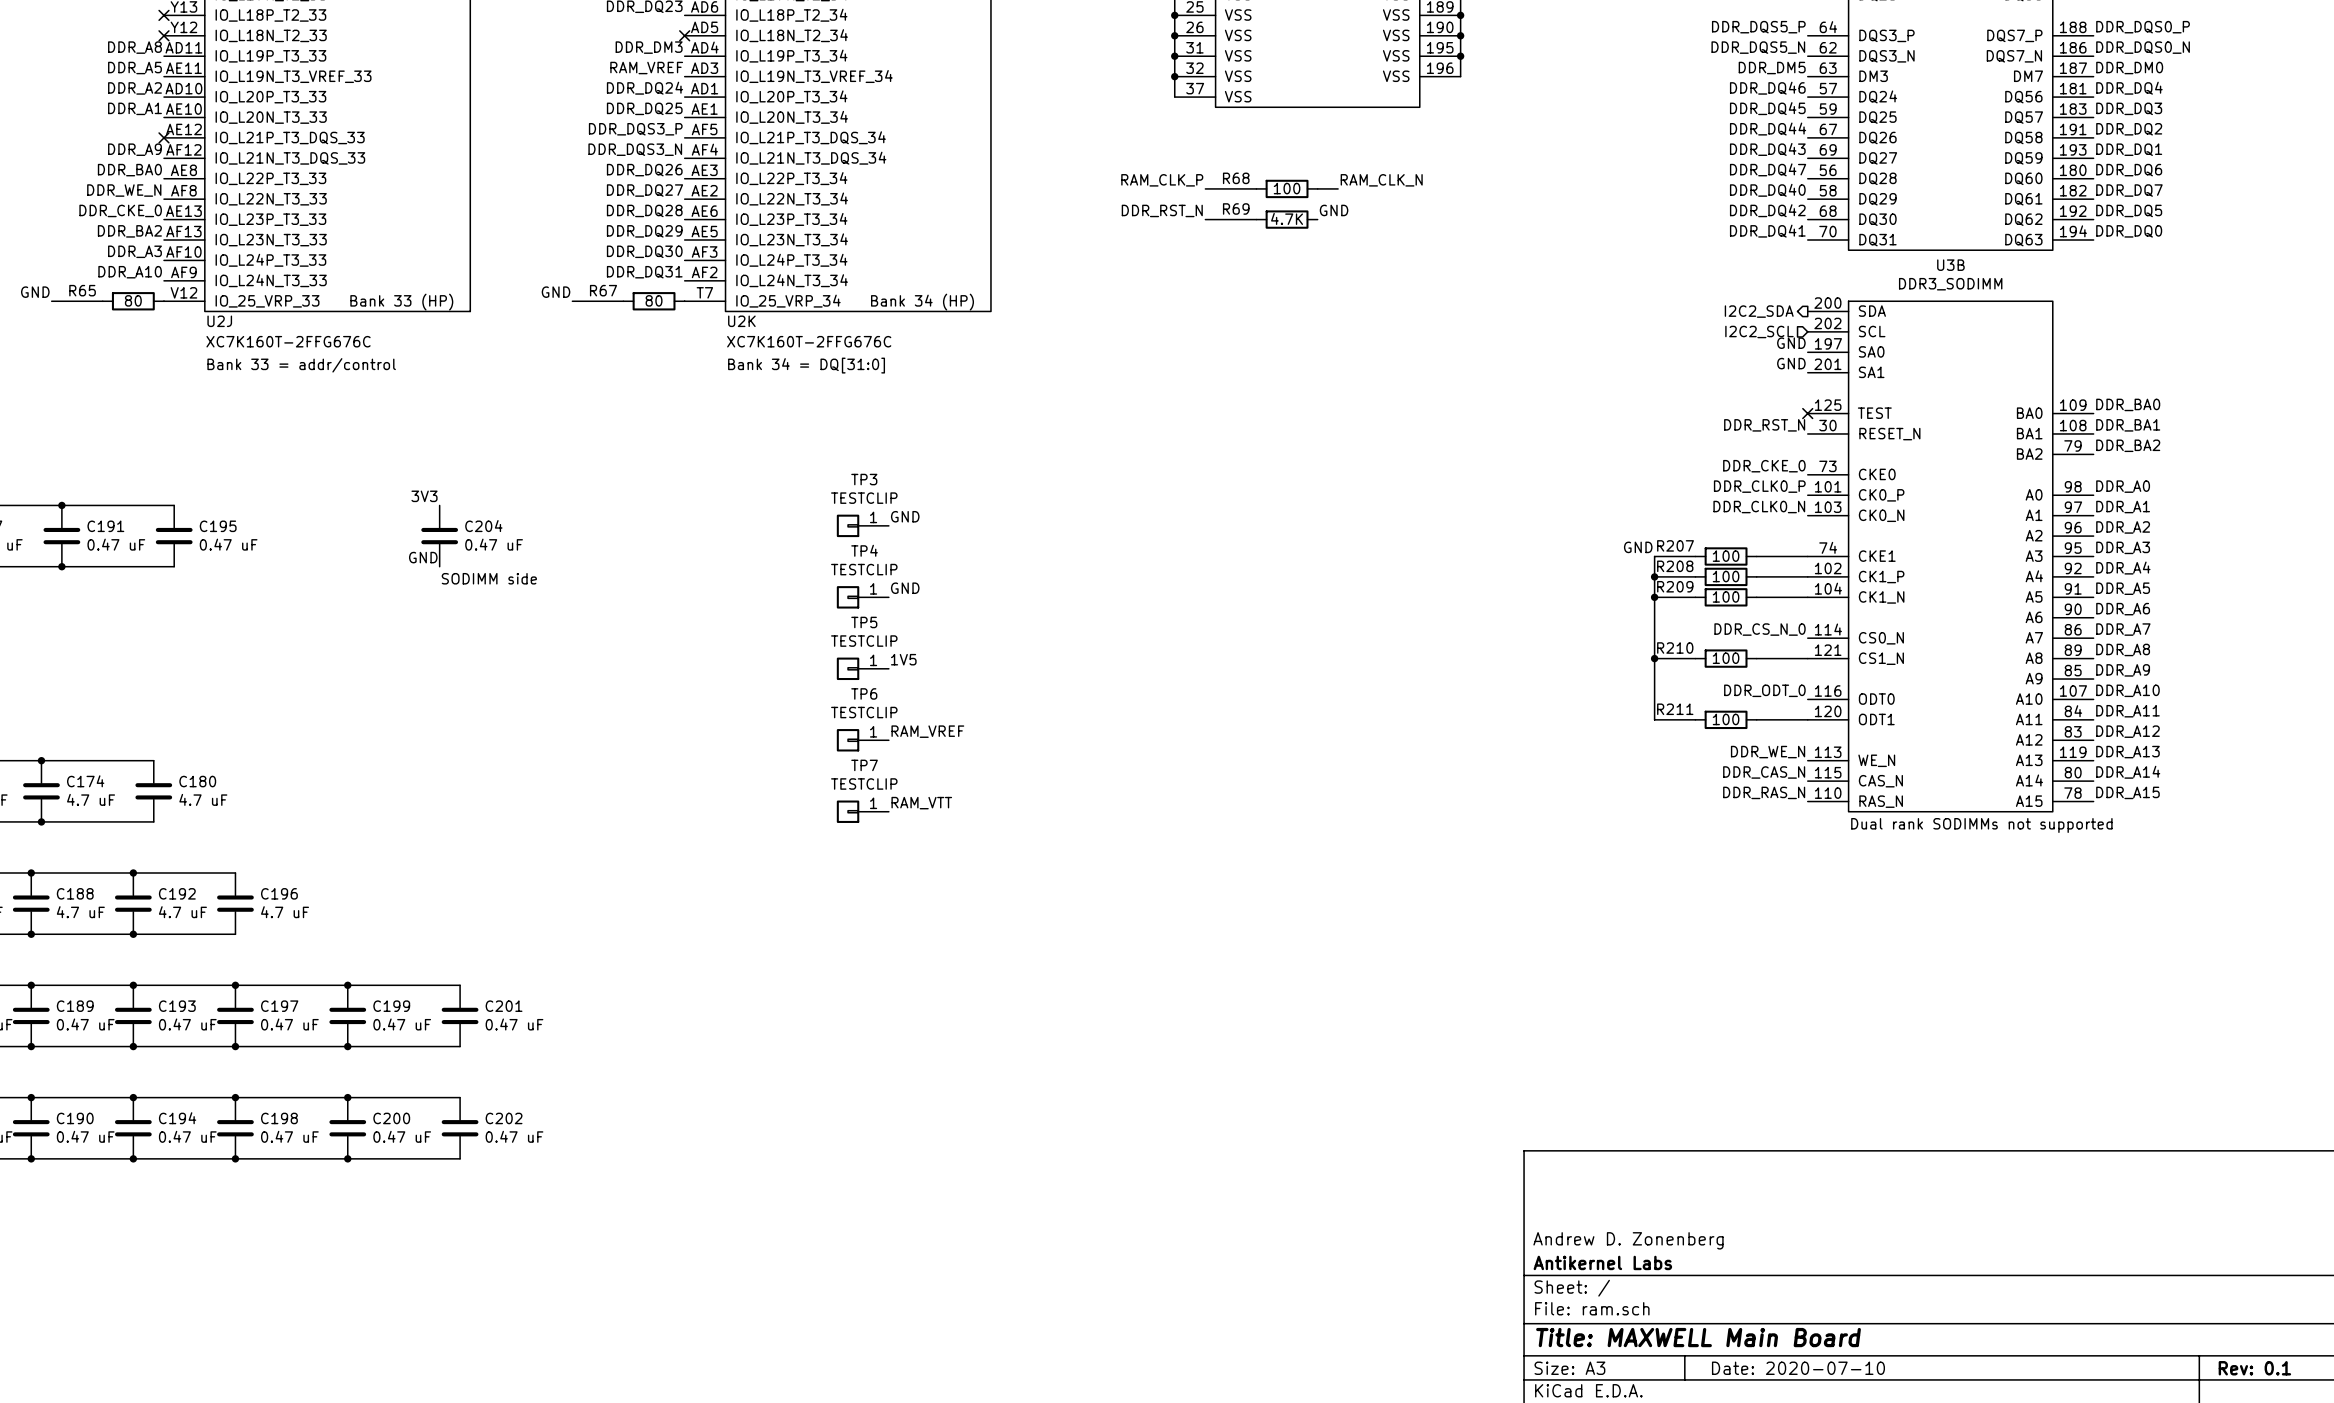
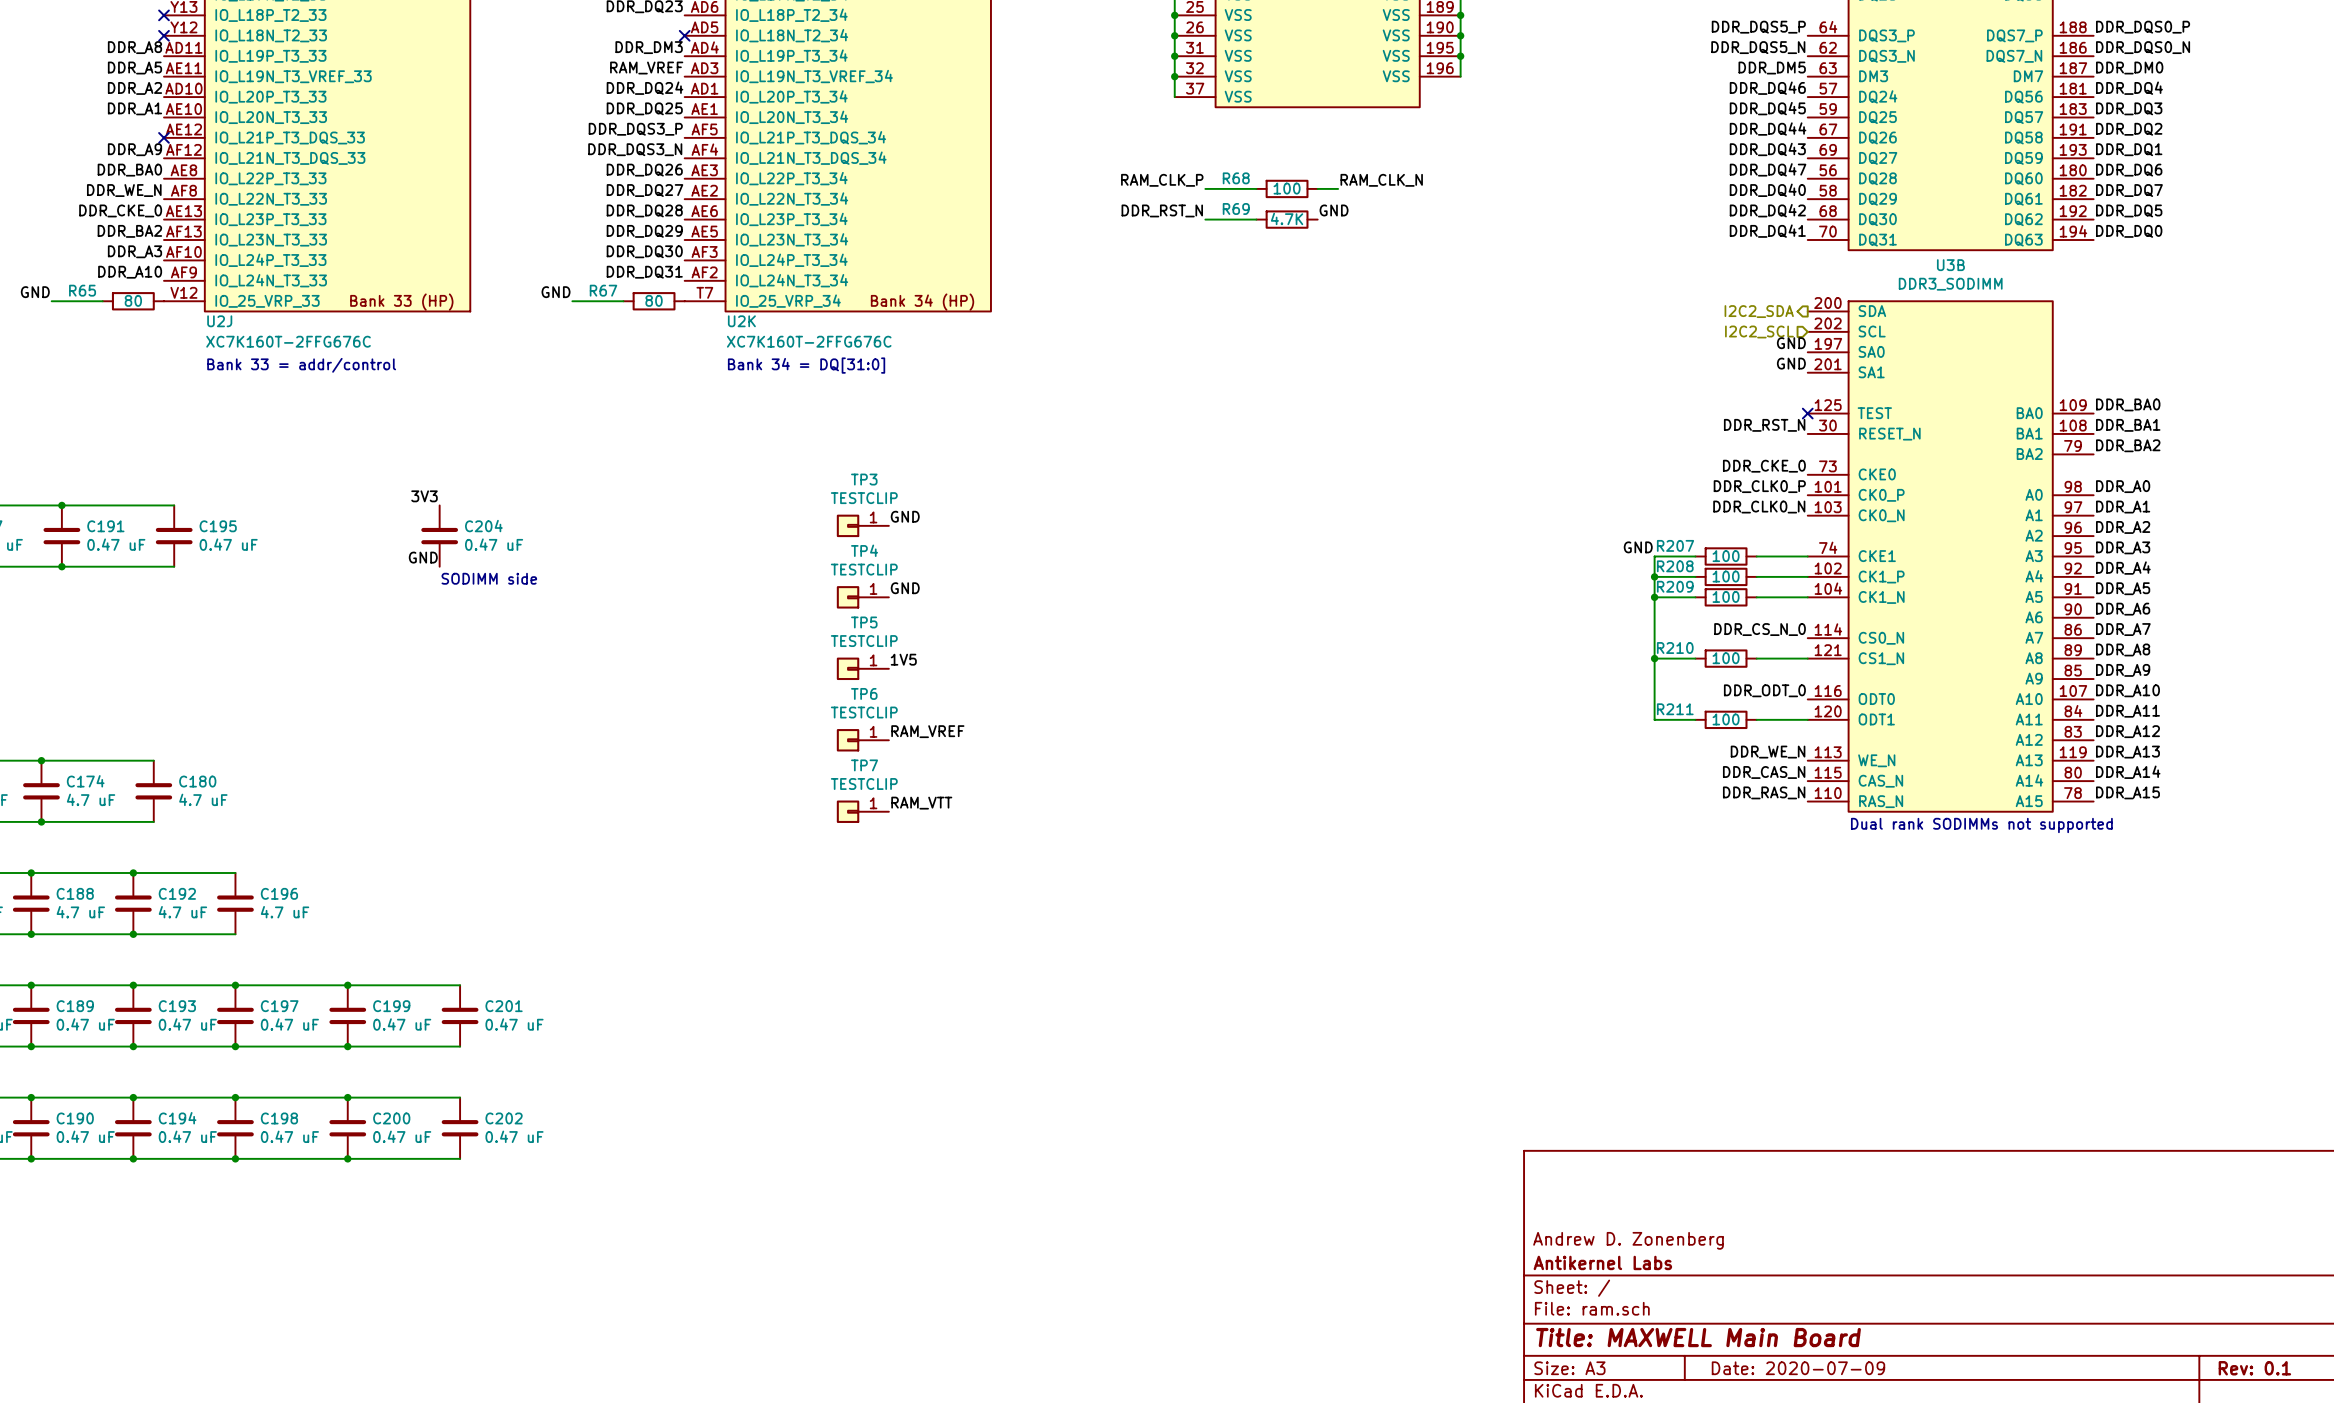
title block: Date: 2020-07-10 (1798, 1368) -> Date: 2020-07-09 (1798, 1368)

